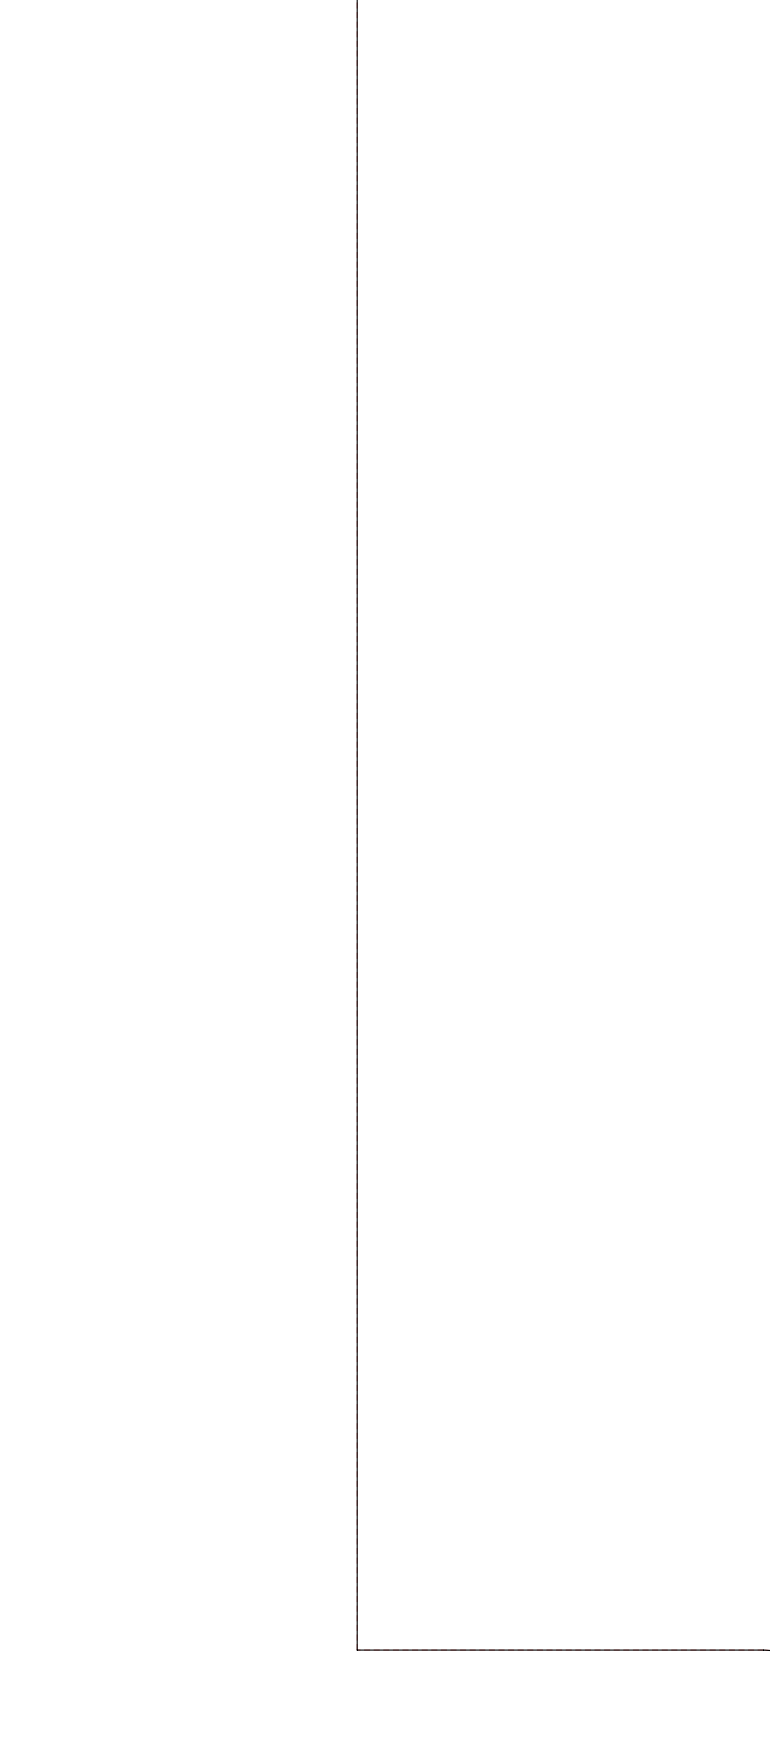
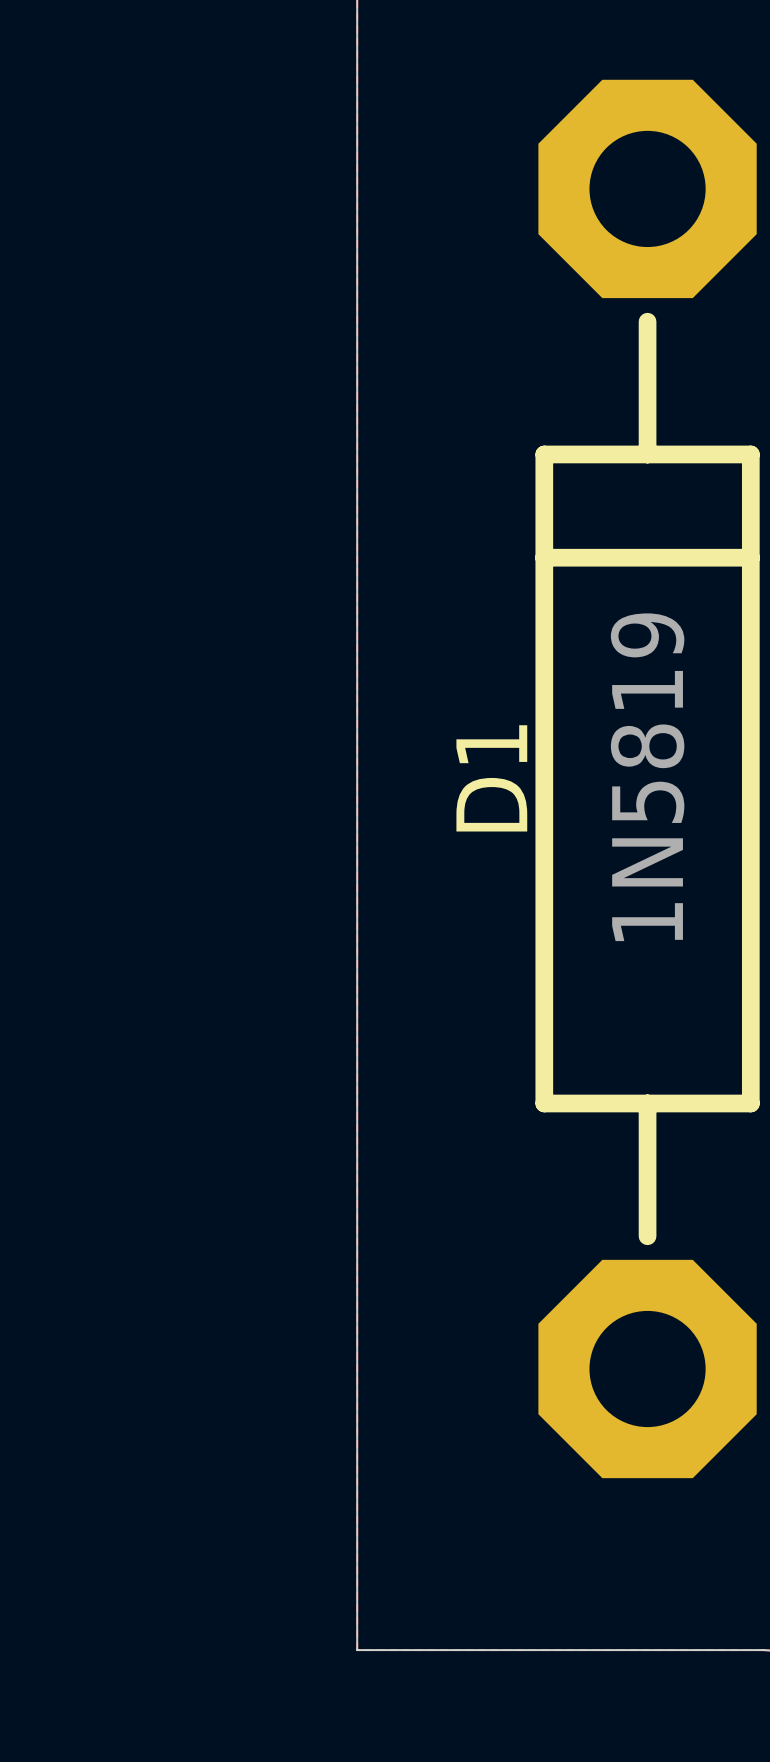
D1: none -> 1N5819 (647, 778)

